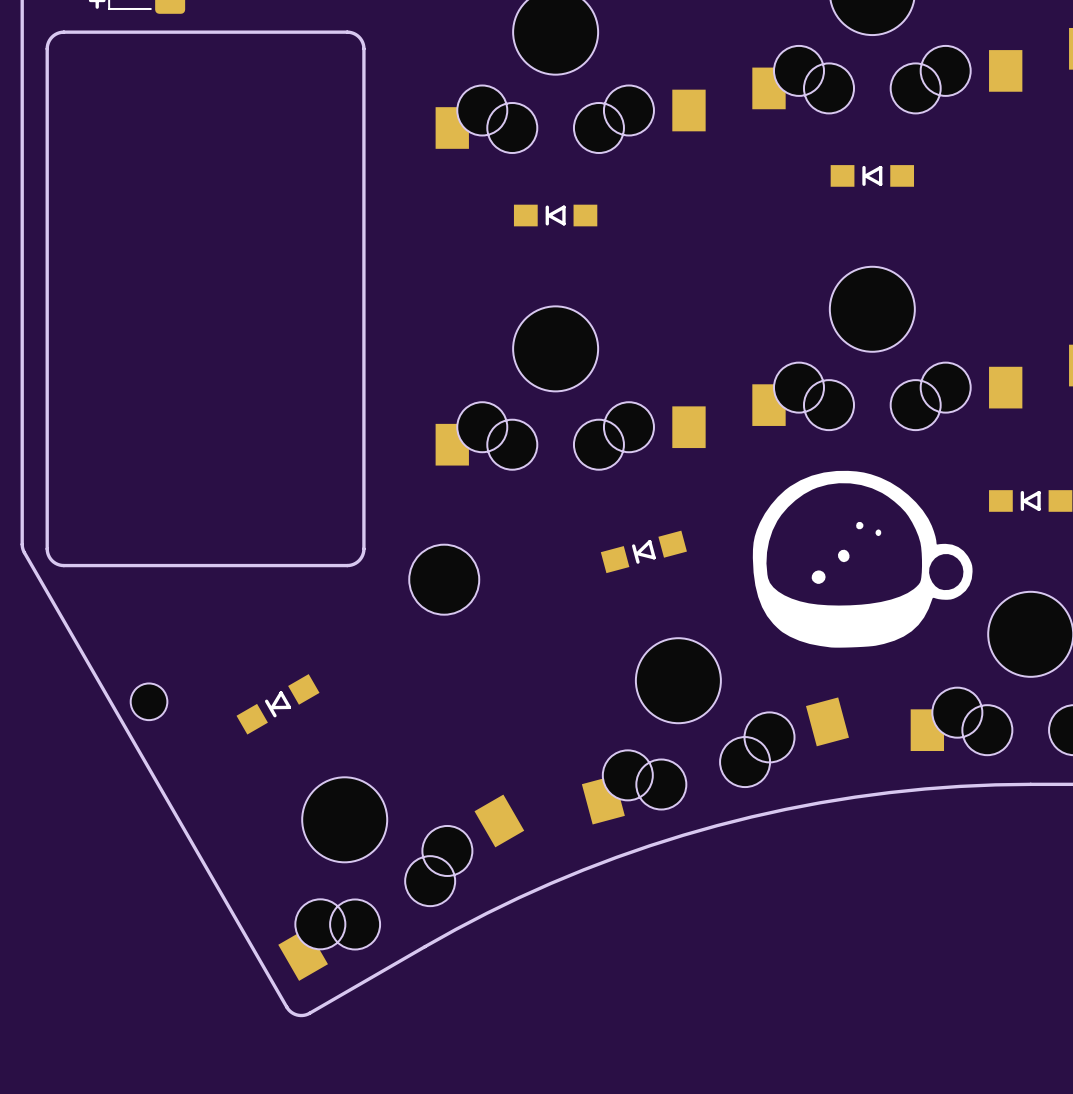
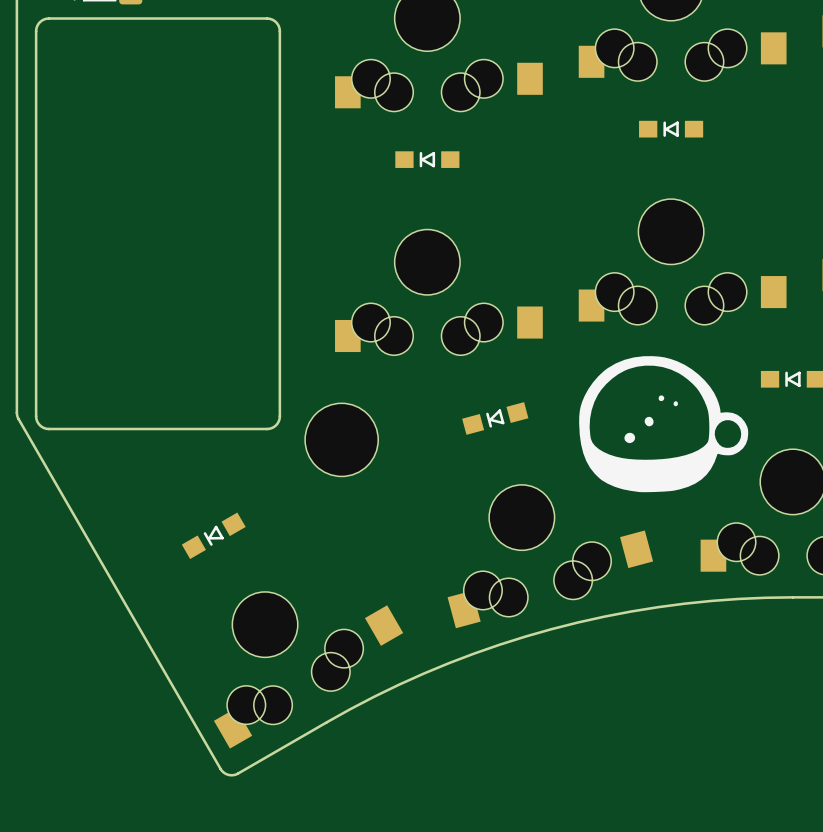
part footprint: [409, 544, 480, 615] -> [305, 403, 379, 477]
part: (149, 701) -> none

